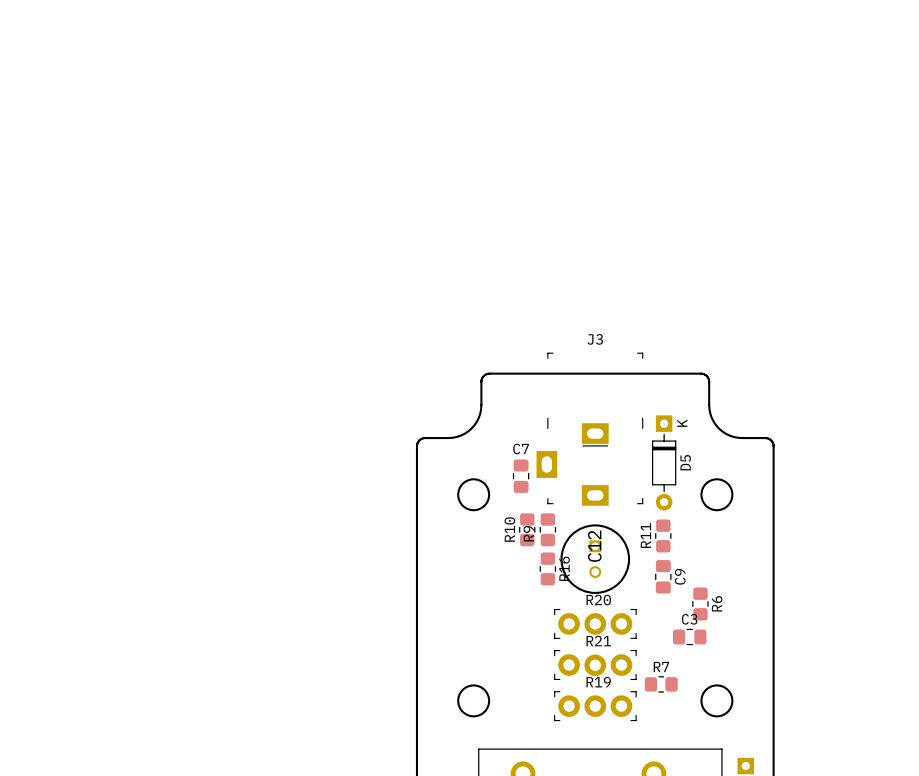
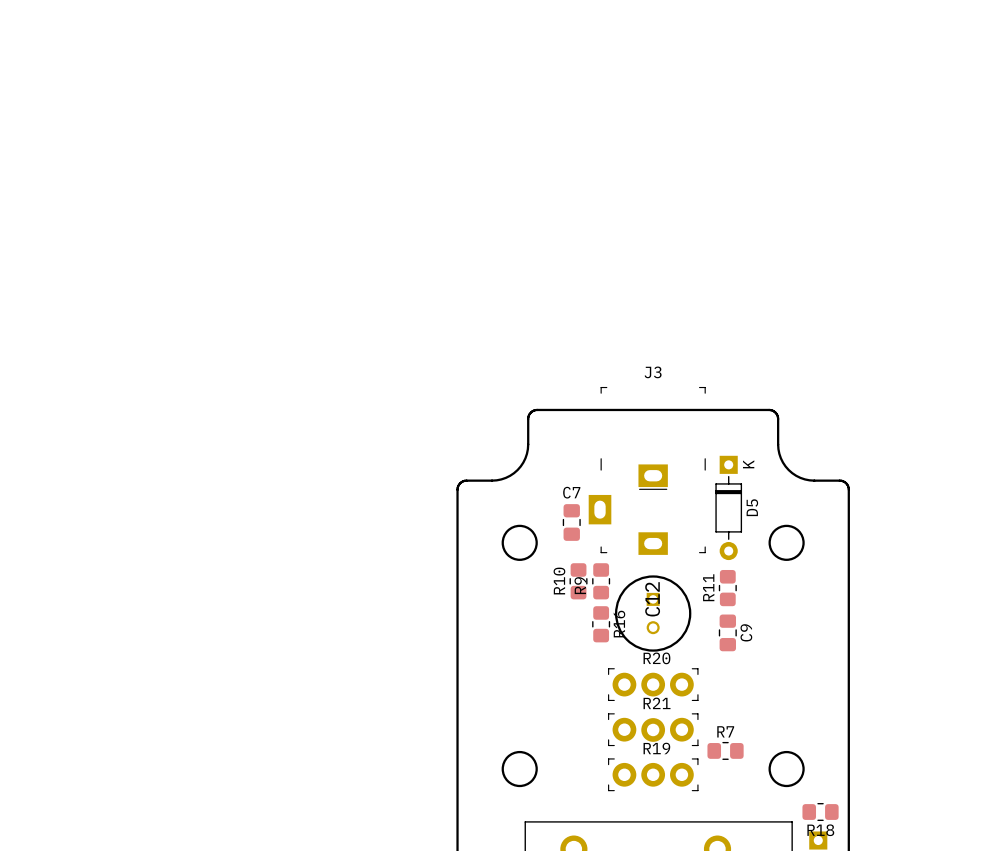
R6: (700, 604) -> none
C3: (689, 636) -> none
R18: none -> (820, 812)

